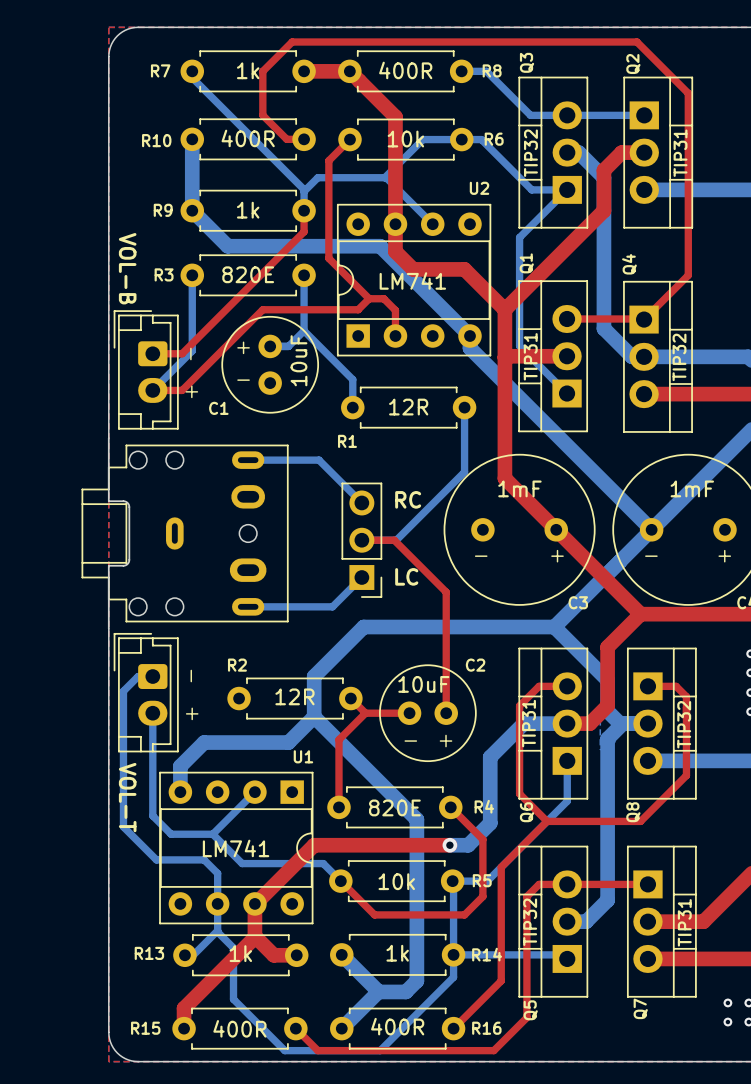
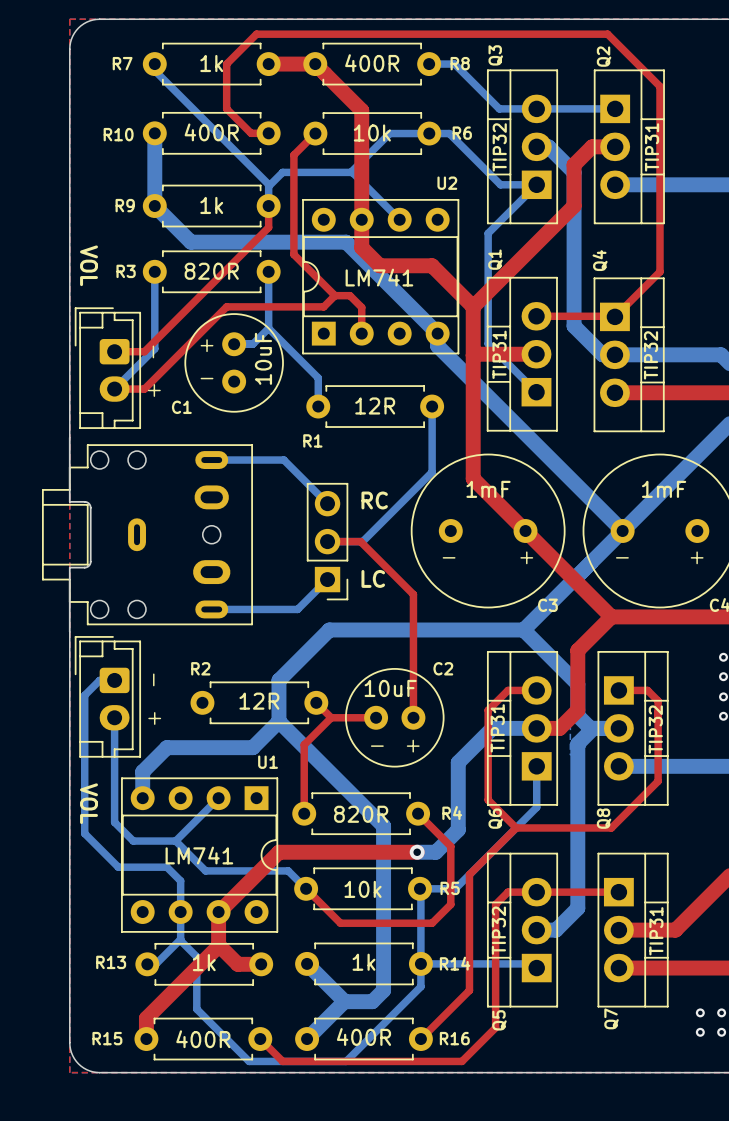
part value: VOL-B (127, 268) -> VOL (89, 265)
R3 value: 820E (248, 274) -> 820R (211, 271)
part value: VOL-T (127, 797) -> VOL (89, 803)
R4 value: 820E (394, 807) -> 820R (361, 814)

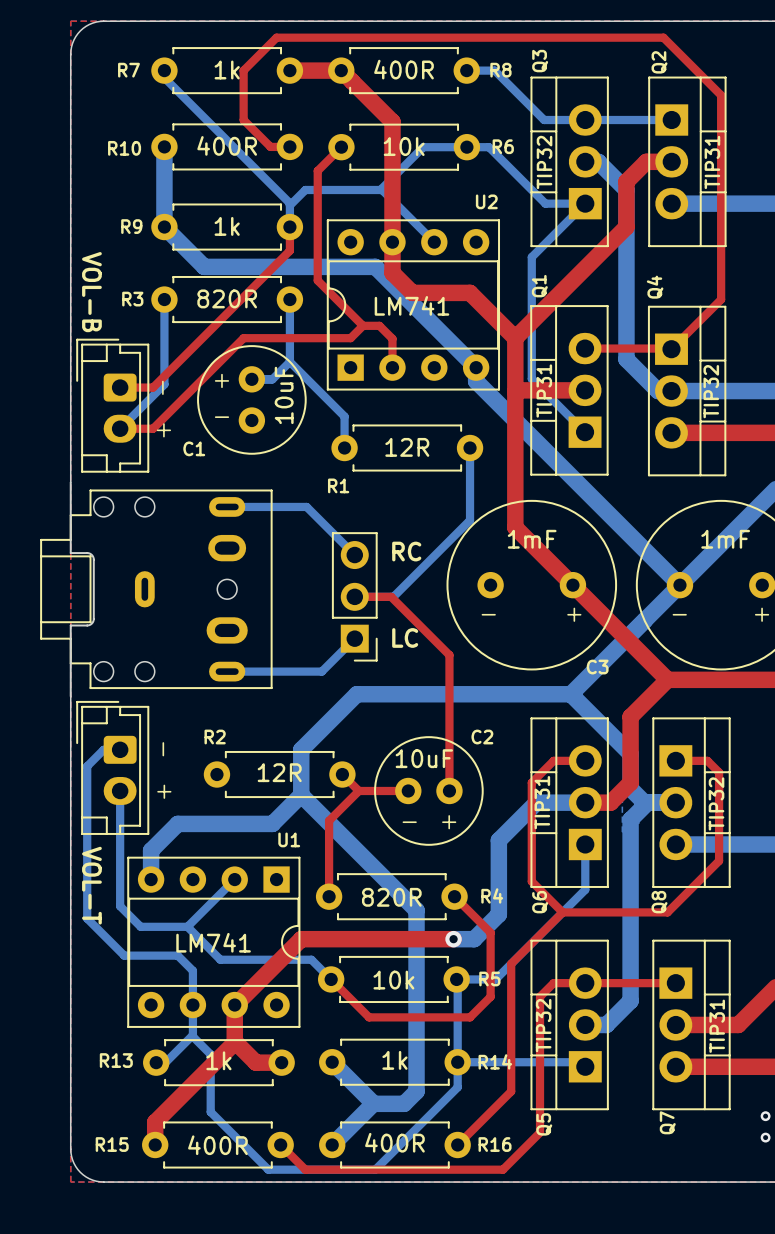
part value: VOL (89, 265) -> VOL-B (91, 292)
part value: VOL (89, 803) -> VOL-T (91, 885)

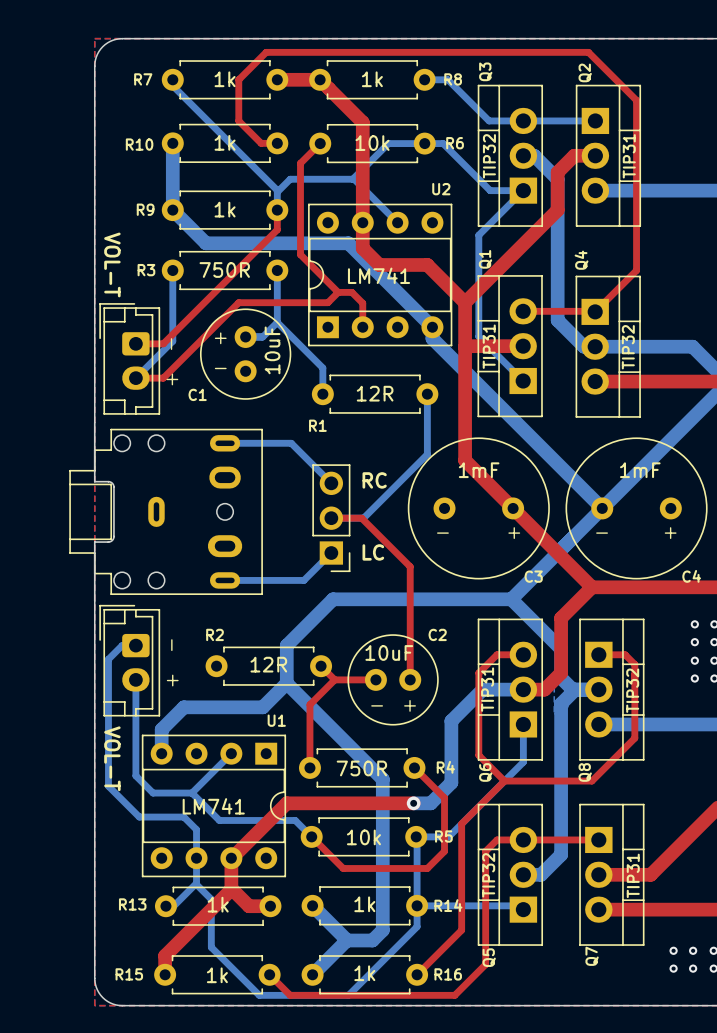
R8 value: 400R (404, 69) -> 1k (372, 79)
R10 value: 400R (227, 145) -> 1k (225, 142)
part value: VOL-B (91, 292) -> VOL-T (112, 264)
R3 value: 820R (227, 298) -> 750R (224, 269)
R4 value: 820R (391, 897) -> 750R (361, 768)
R16 value: 400R (394, 1142) -> 1k (364, 973)
R15 value: 400R (217, 1145) -> 1k (217, 975)

